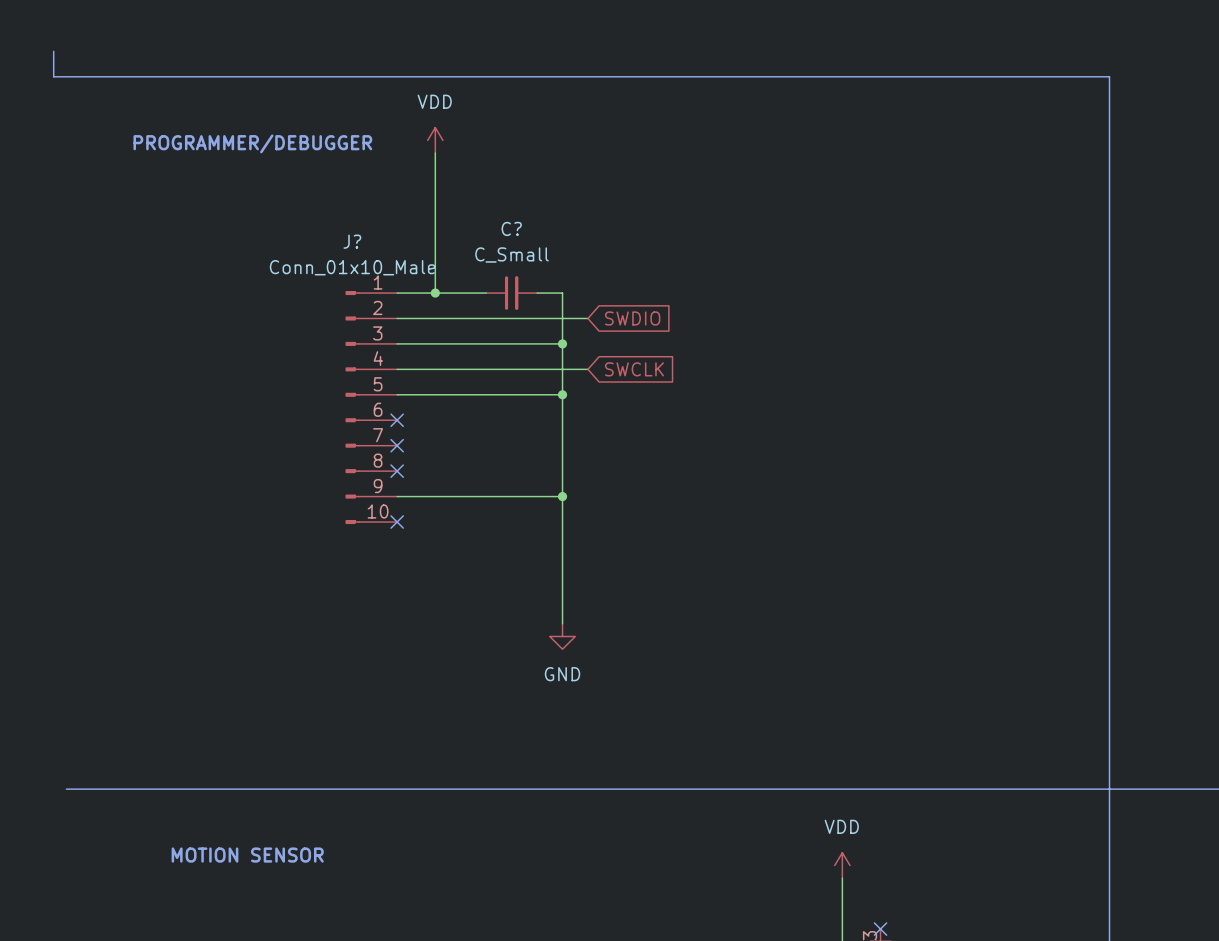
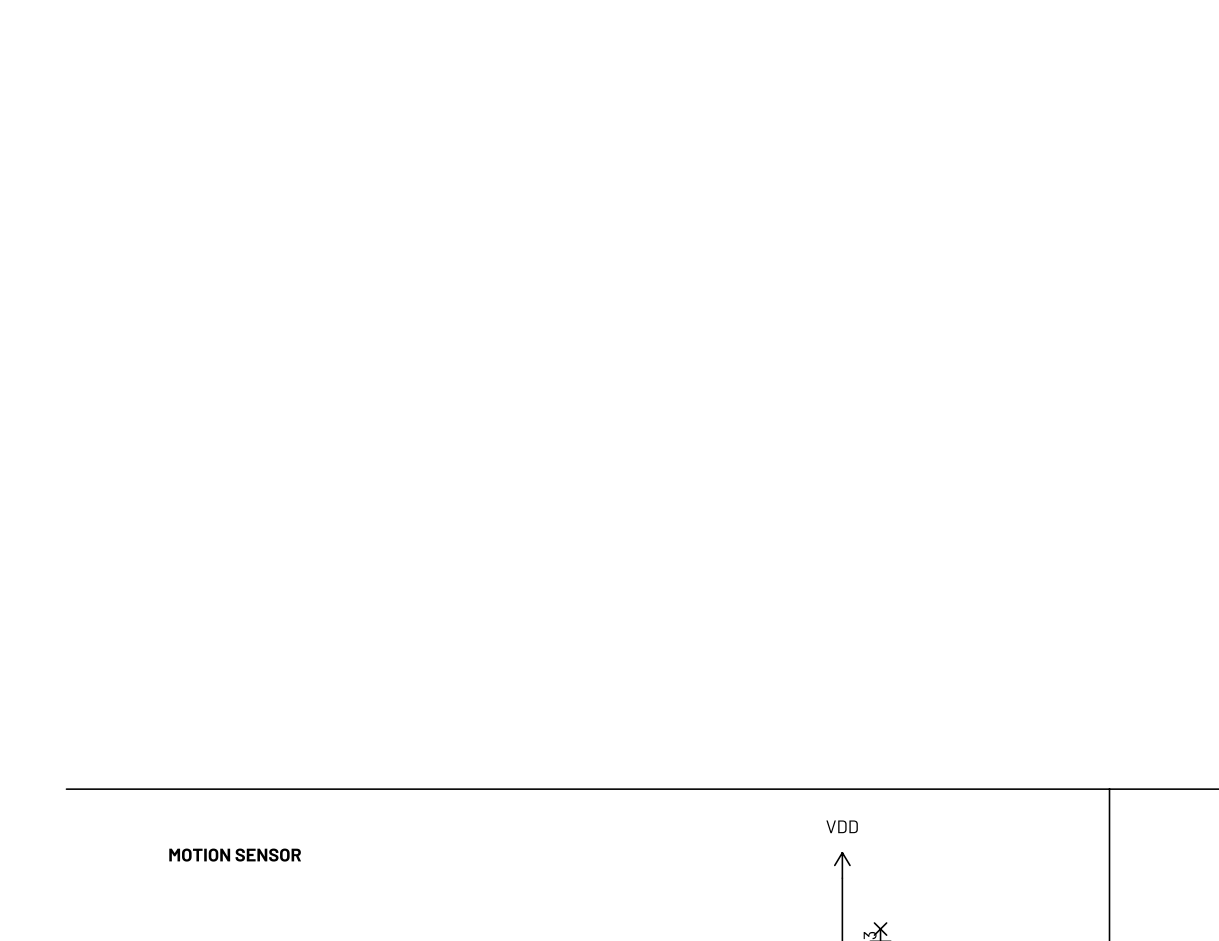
line: (53, 51) (53, 76) (1109, 76) (1109, 789) -> none
power symbol: VDD (435, 140) -> none
text: PROGRAMMER/DEBUGGER (252, 143) -> none
wire: (435, 153) (435, 293) -> none
wire: (397, 293) (486, 293) -> none
junction: (435, 293) -> none
C?: C_Small (511, 293) -> none
wire: (537, 293) (562, 293) (562, 623) -> none
wire: (397, 318) (587, 318) -> none
global label: SWDIO (632, 318) -> none
wire: (397, 343) (562, 343) -> none
junction: (562, 343) -> none
wire: (397, 369) (587, 369) -> none
global label: SWCLK (634, 369) -> none
wire: (397, 394) (562, 394) -> none
junction: (562, 394) -> none
J?: Conn_01x10_Male (371, 407) -> none
no-connect mark: (397, 420) -> none
no-connect mark: (397, 445) -> none
no-connect mark: (397, 471) -> none
wire: (397, 496) (562, 496) -> none
junction: (562, 496) -> none
no-connect mark: (397, 522) -> none
power symbol: GND (562, 636) -> none

